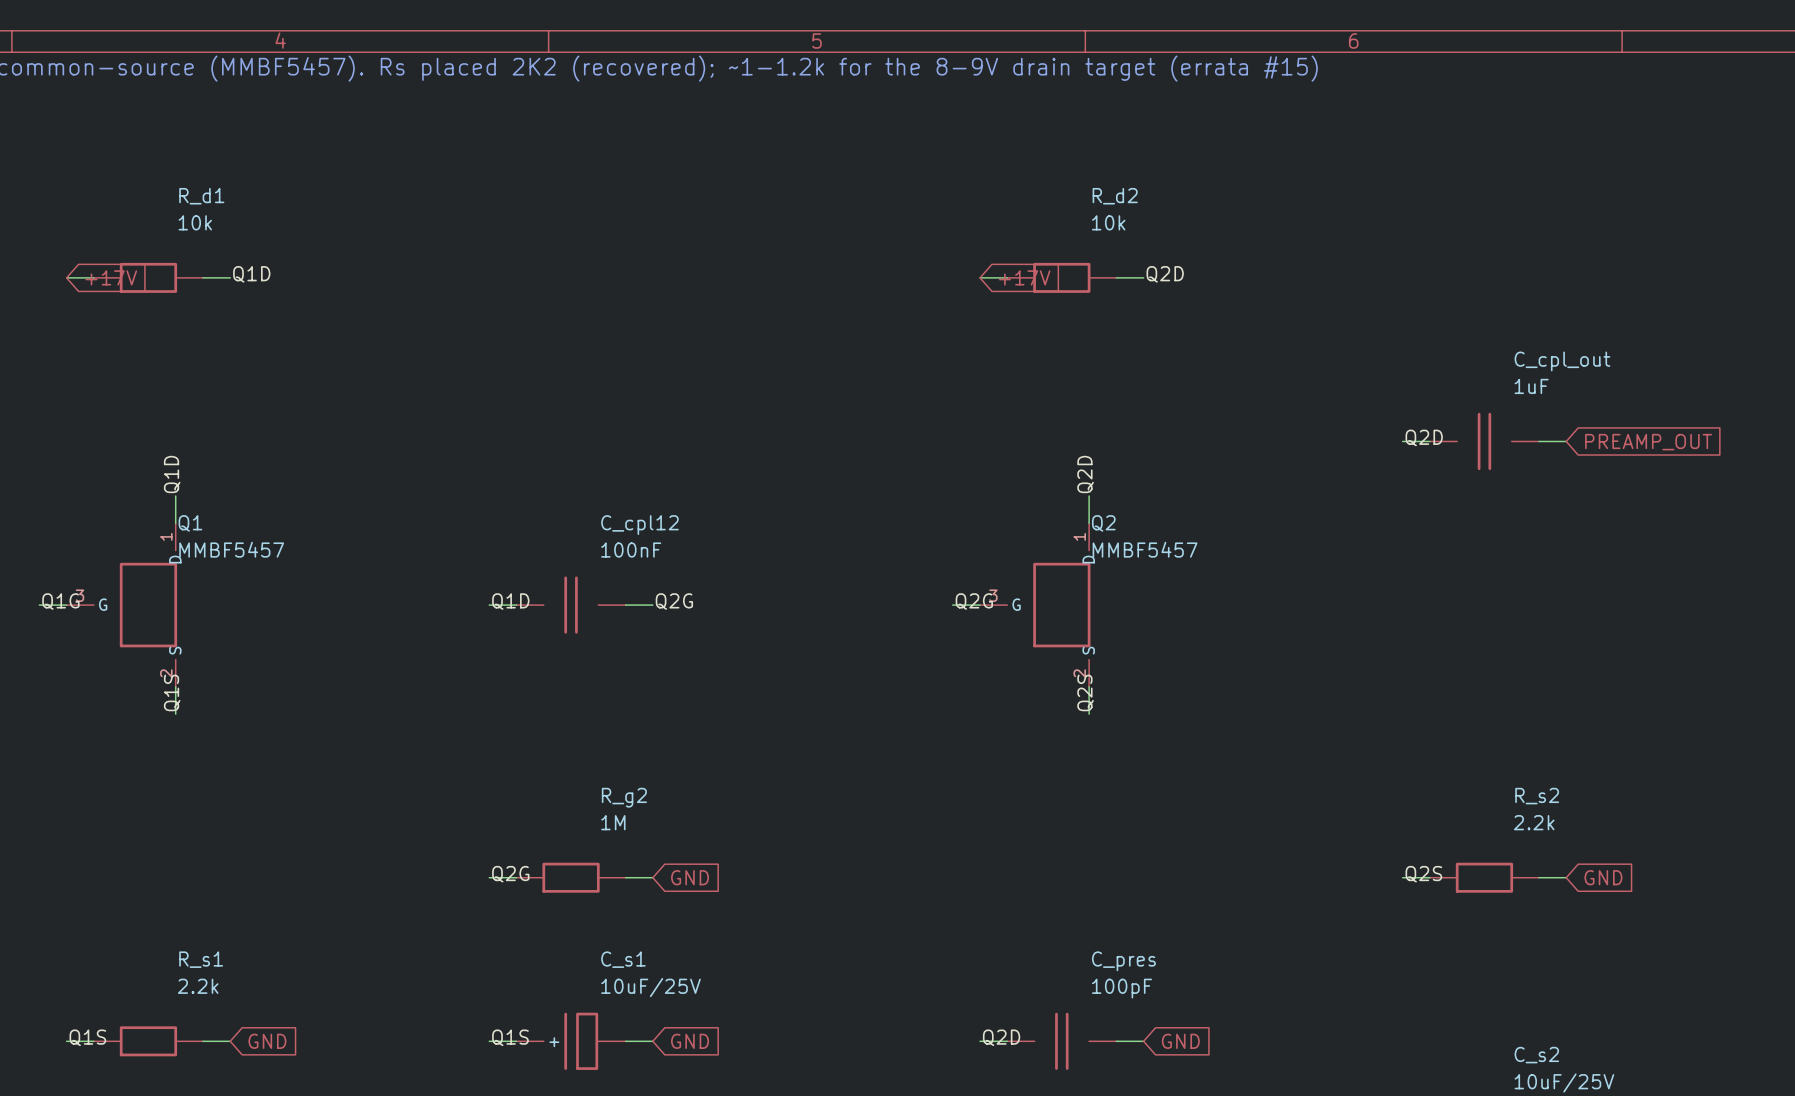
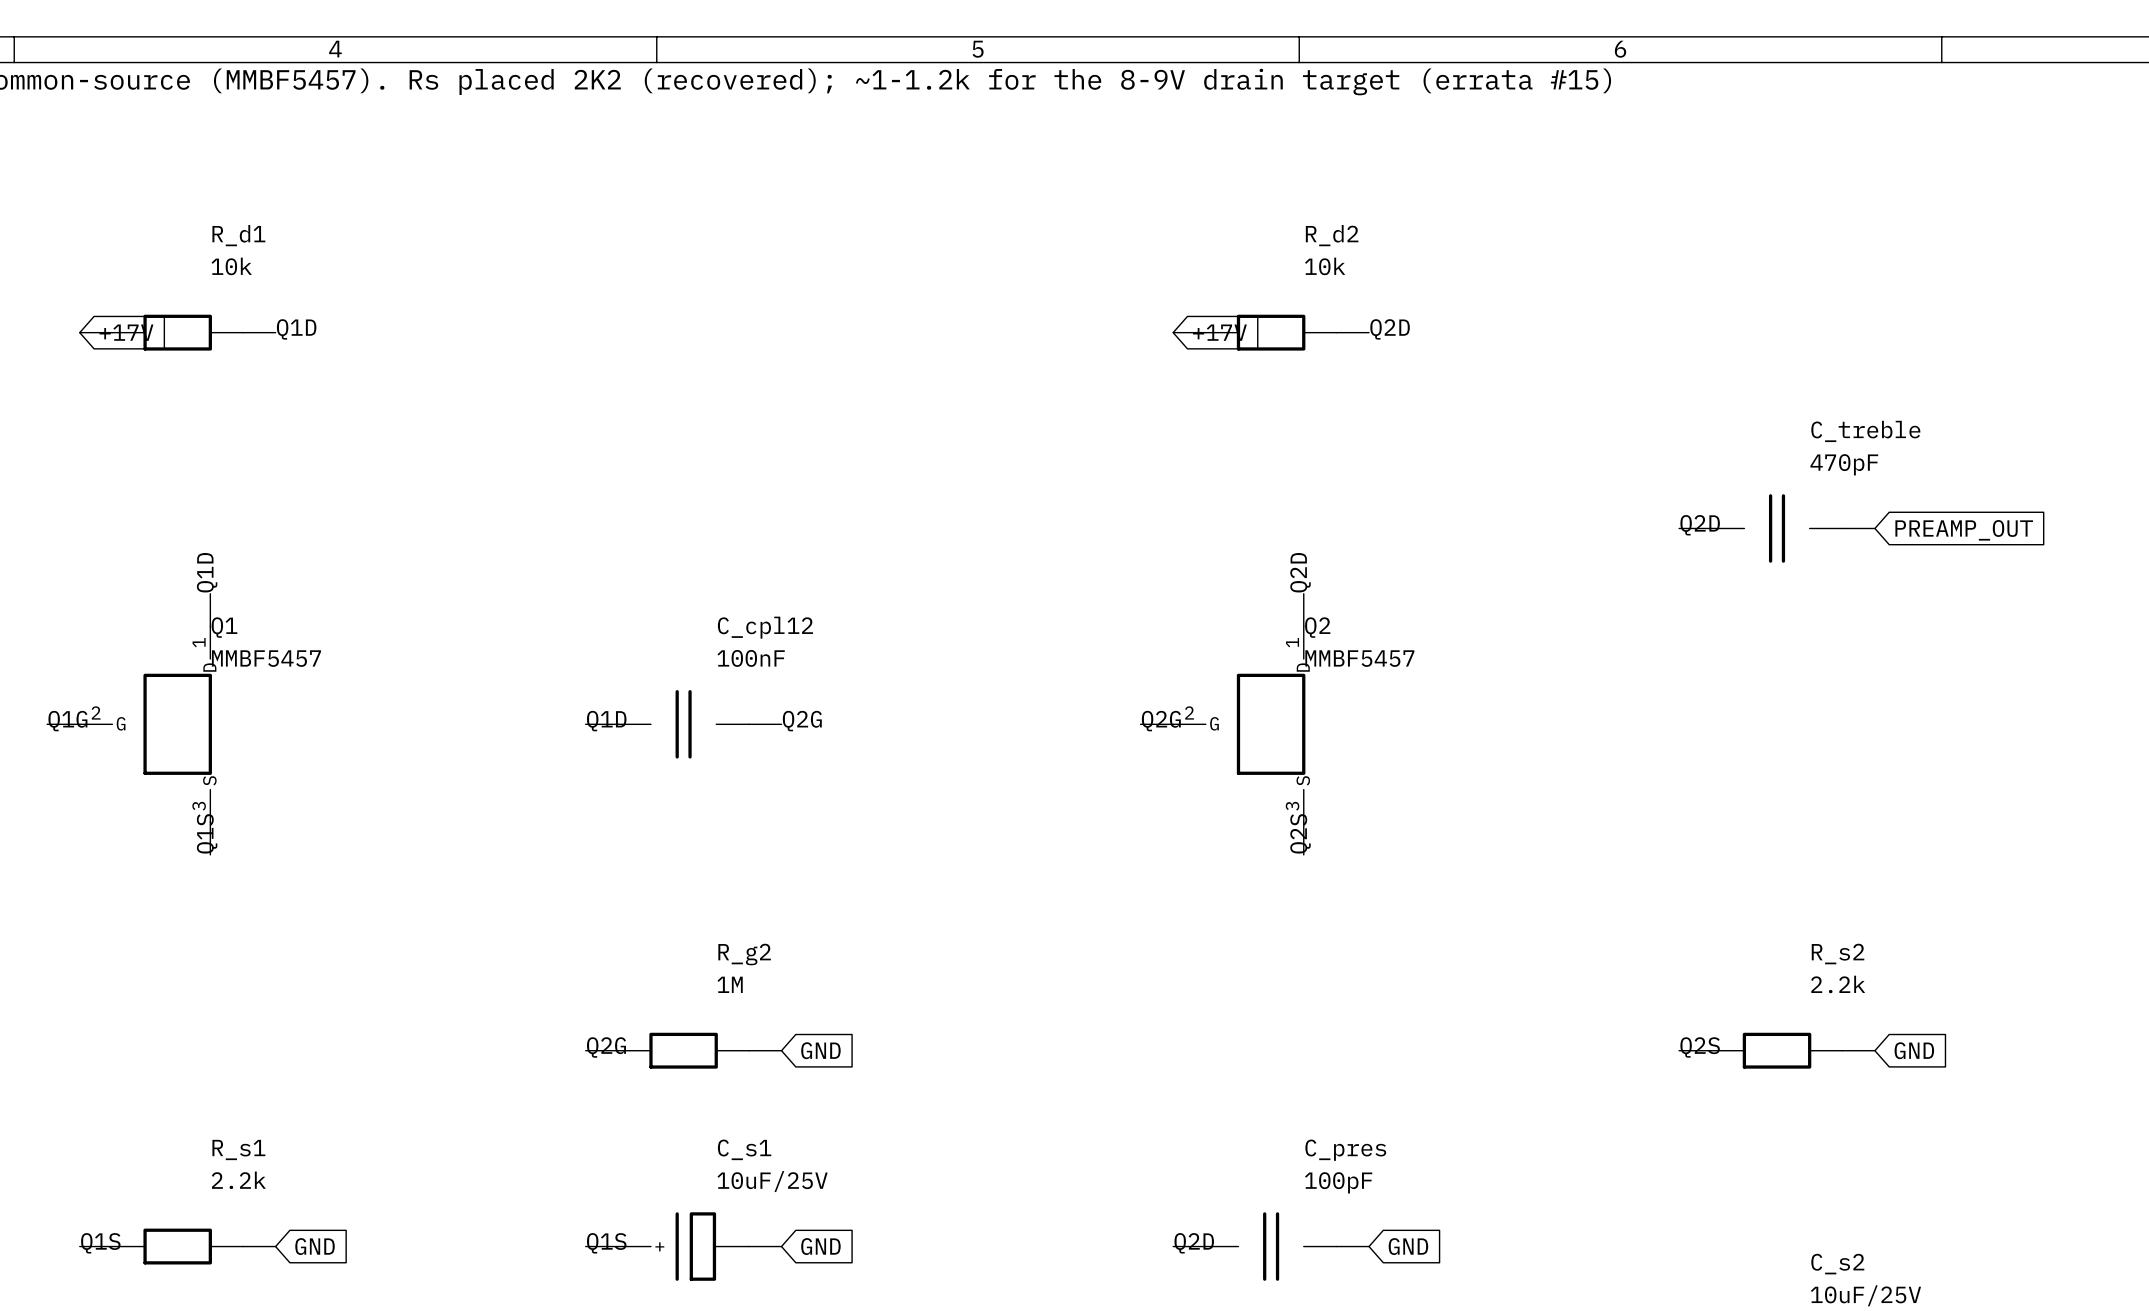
C_cpl_out name: C_cpl_out (1562, 361) -> C_treble (1865, 431)
C_cpl_out value: 1uF (1531, 386) -> 470pF (1844, 464)
Q1 pin number: 3 (80, 595) -> 2 (96, 712)
Q2 pin number: 3 (993, 595) -> 2 (1189, 712)
Q1 pin number: 2 (166, 673) -> 3 (199, 806)
Q2 pin number: 2 (1079, 673) -> 3 (1292, 806)

